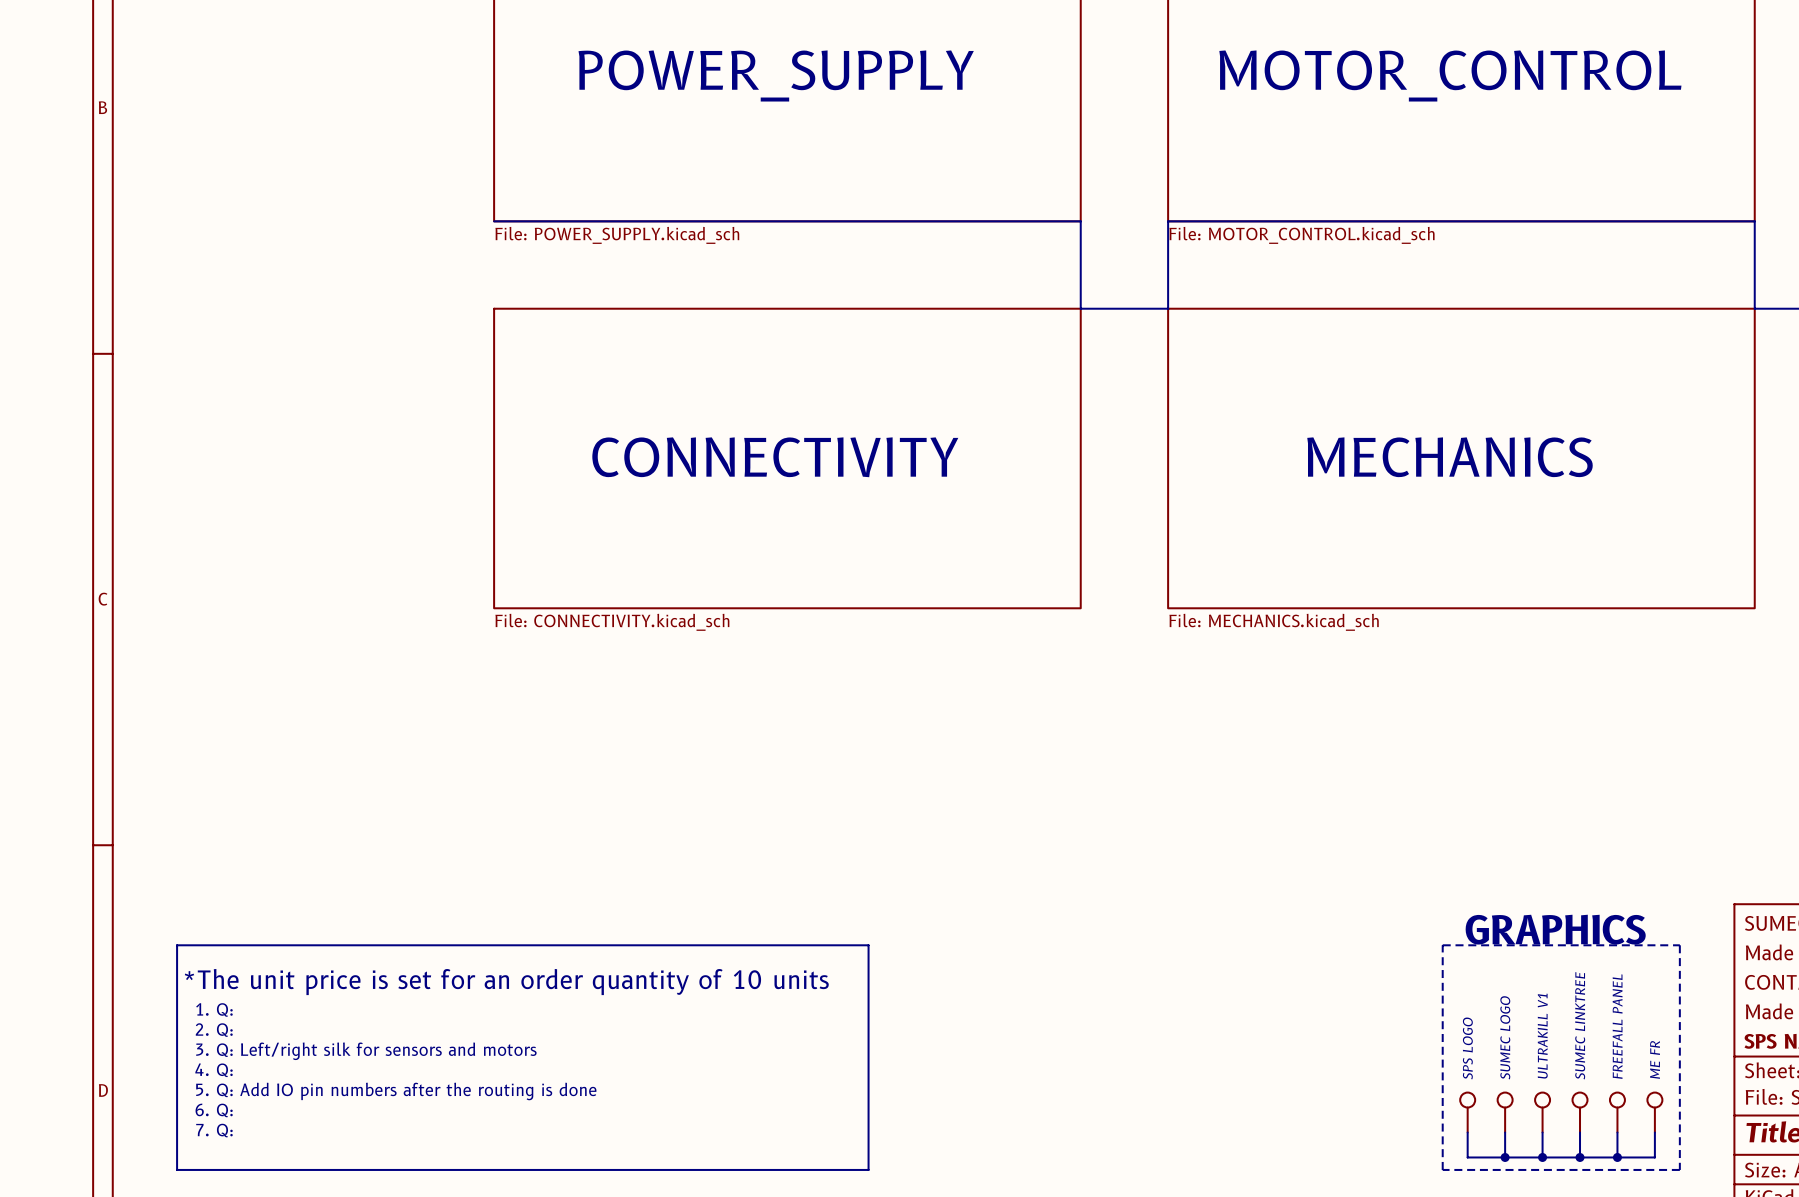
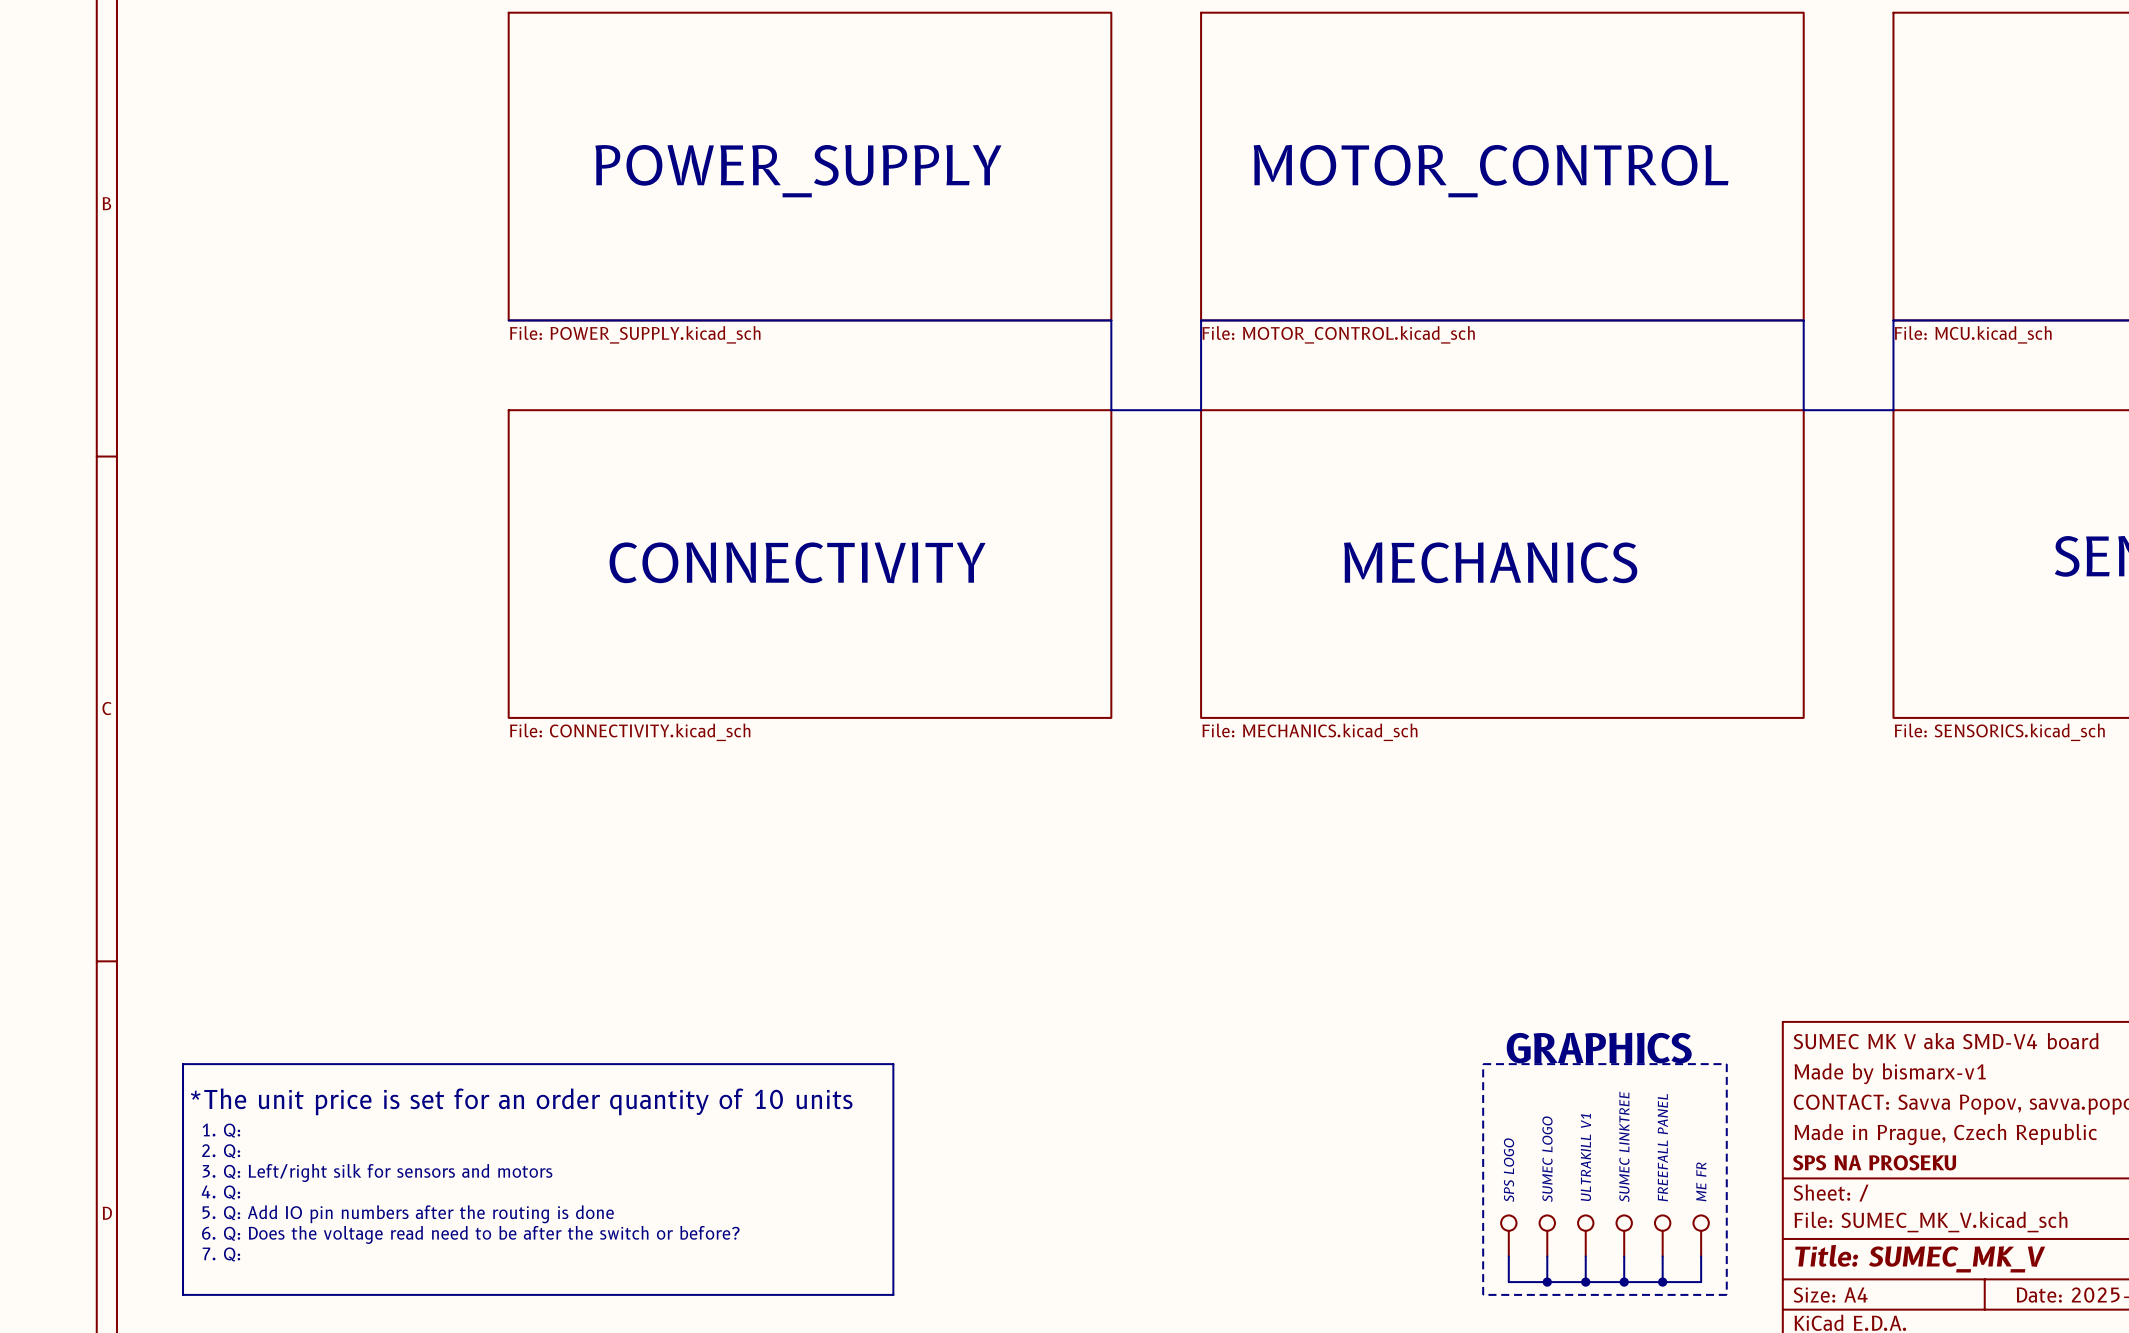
text: 6. Q: (214, 1110) -> 6. Q: Does the voltage read need to be after the switch or before? (470, 1234)

